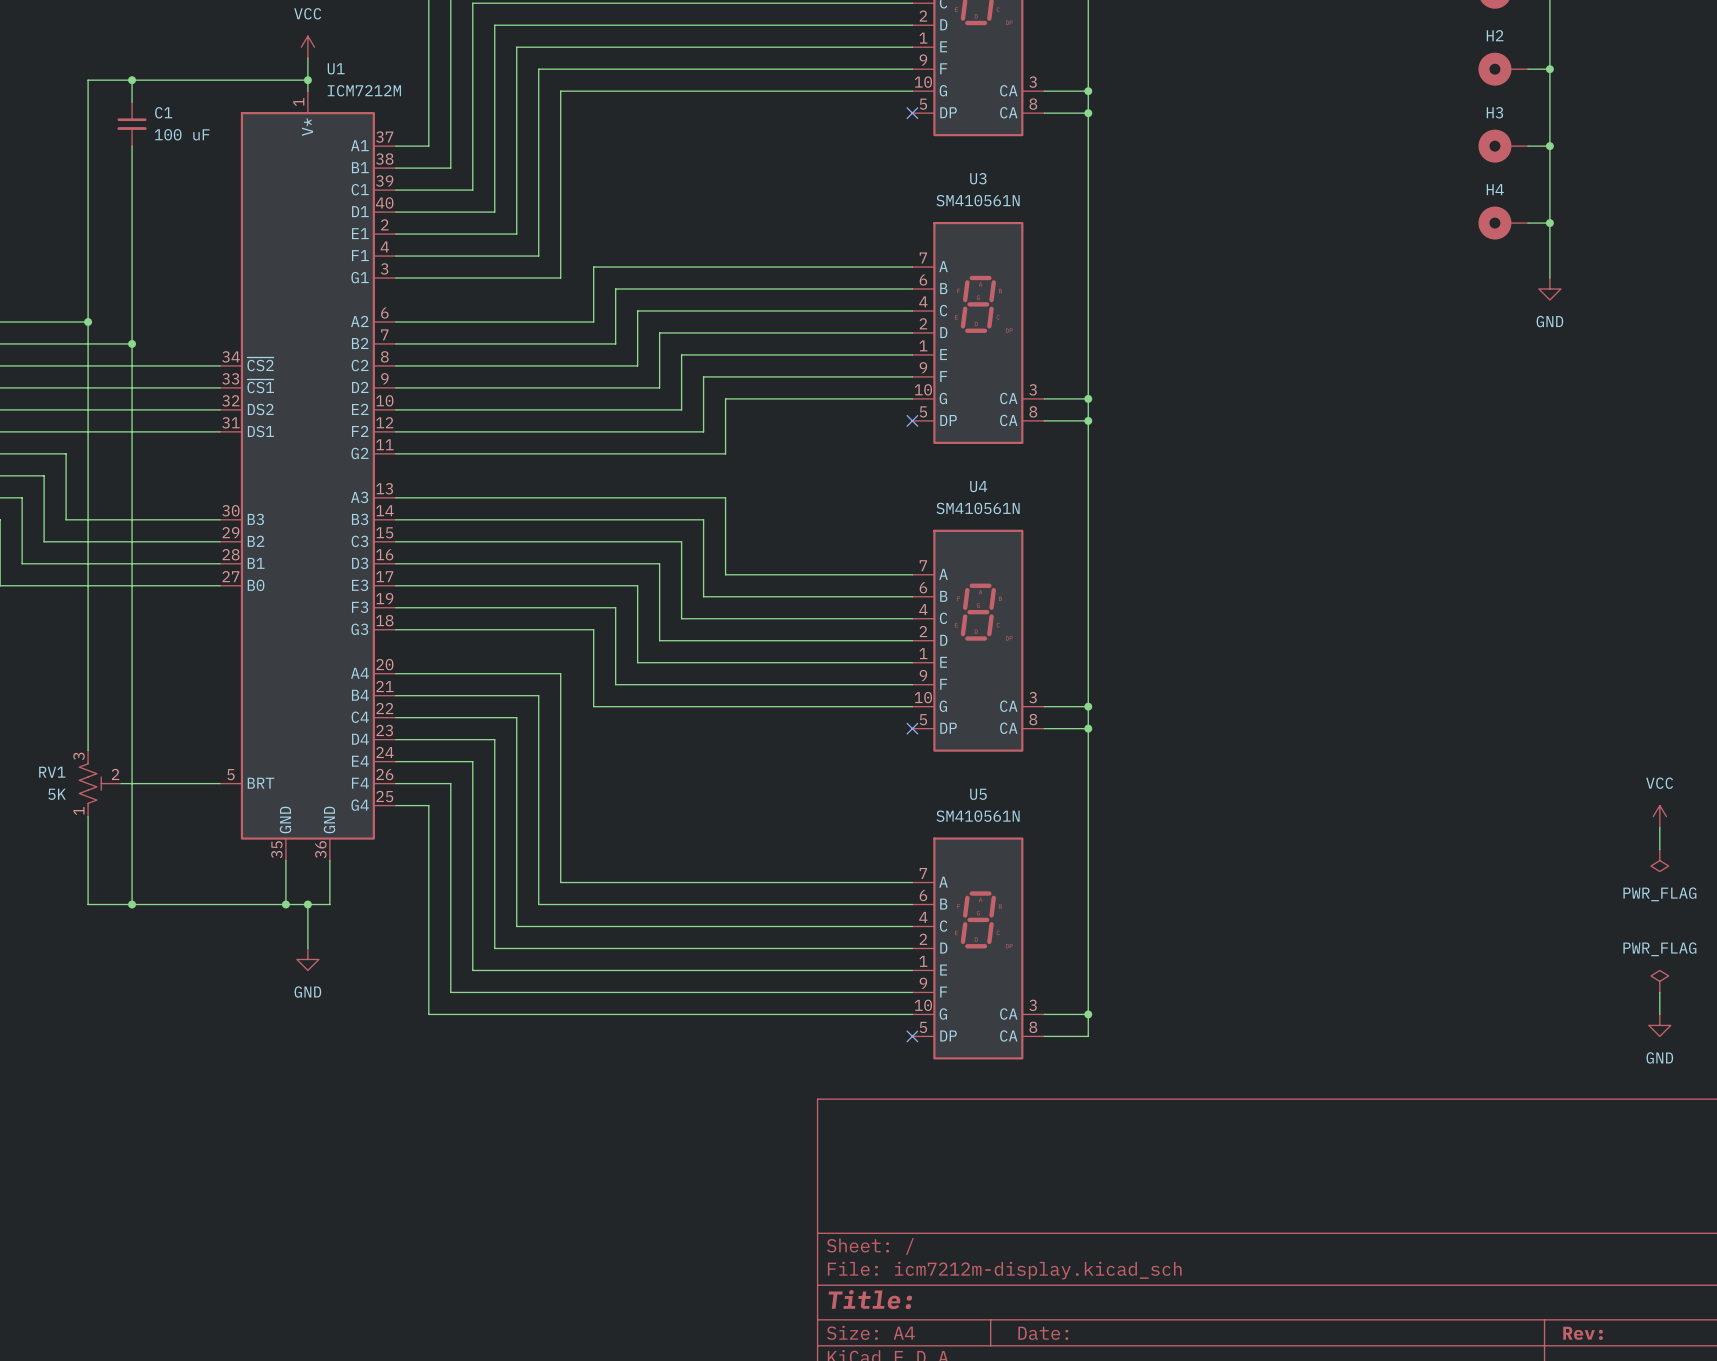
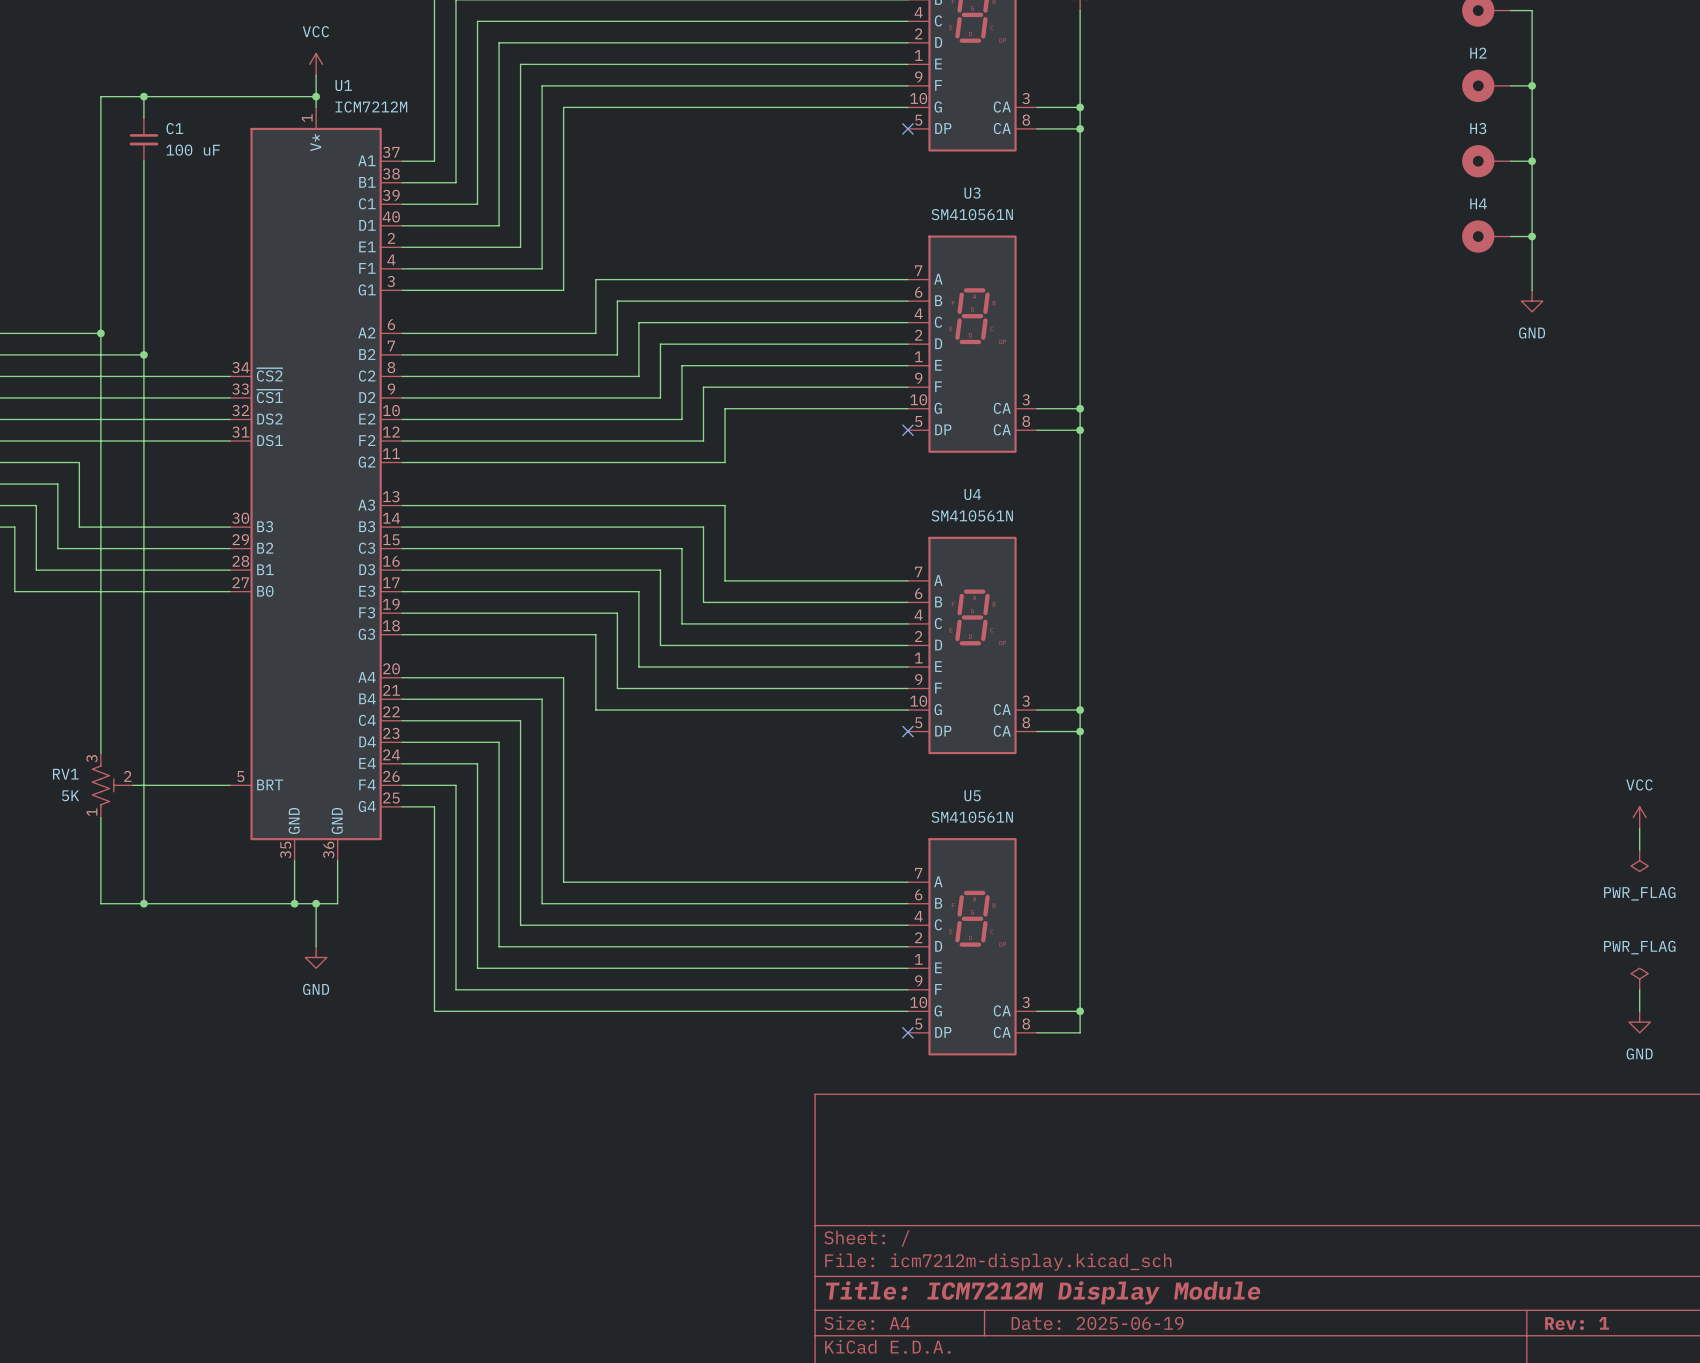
title block: Title: (870, 1299) -> Title: ICM7212M Display Module (1043, 1292)
title block: Date: (1043, 1333) -> Date: 2025-06-19 (1097, 1323)
title block: Rev: (1583, 1333) -> Rev: 1 (1577, 1323)

